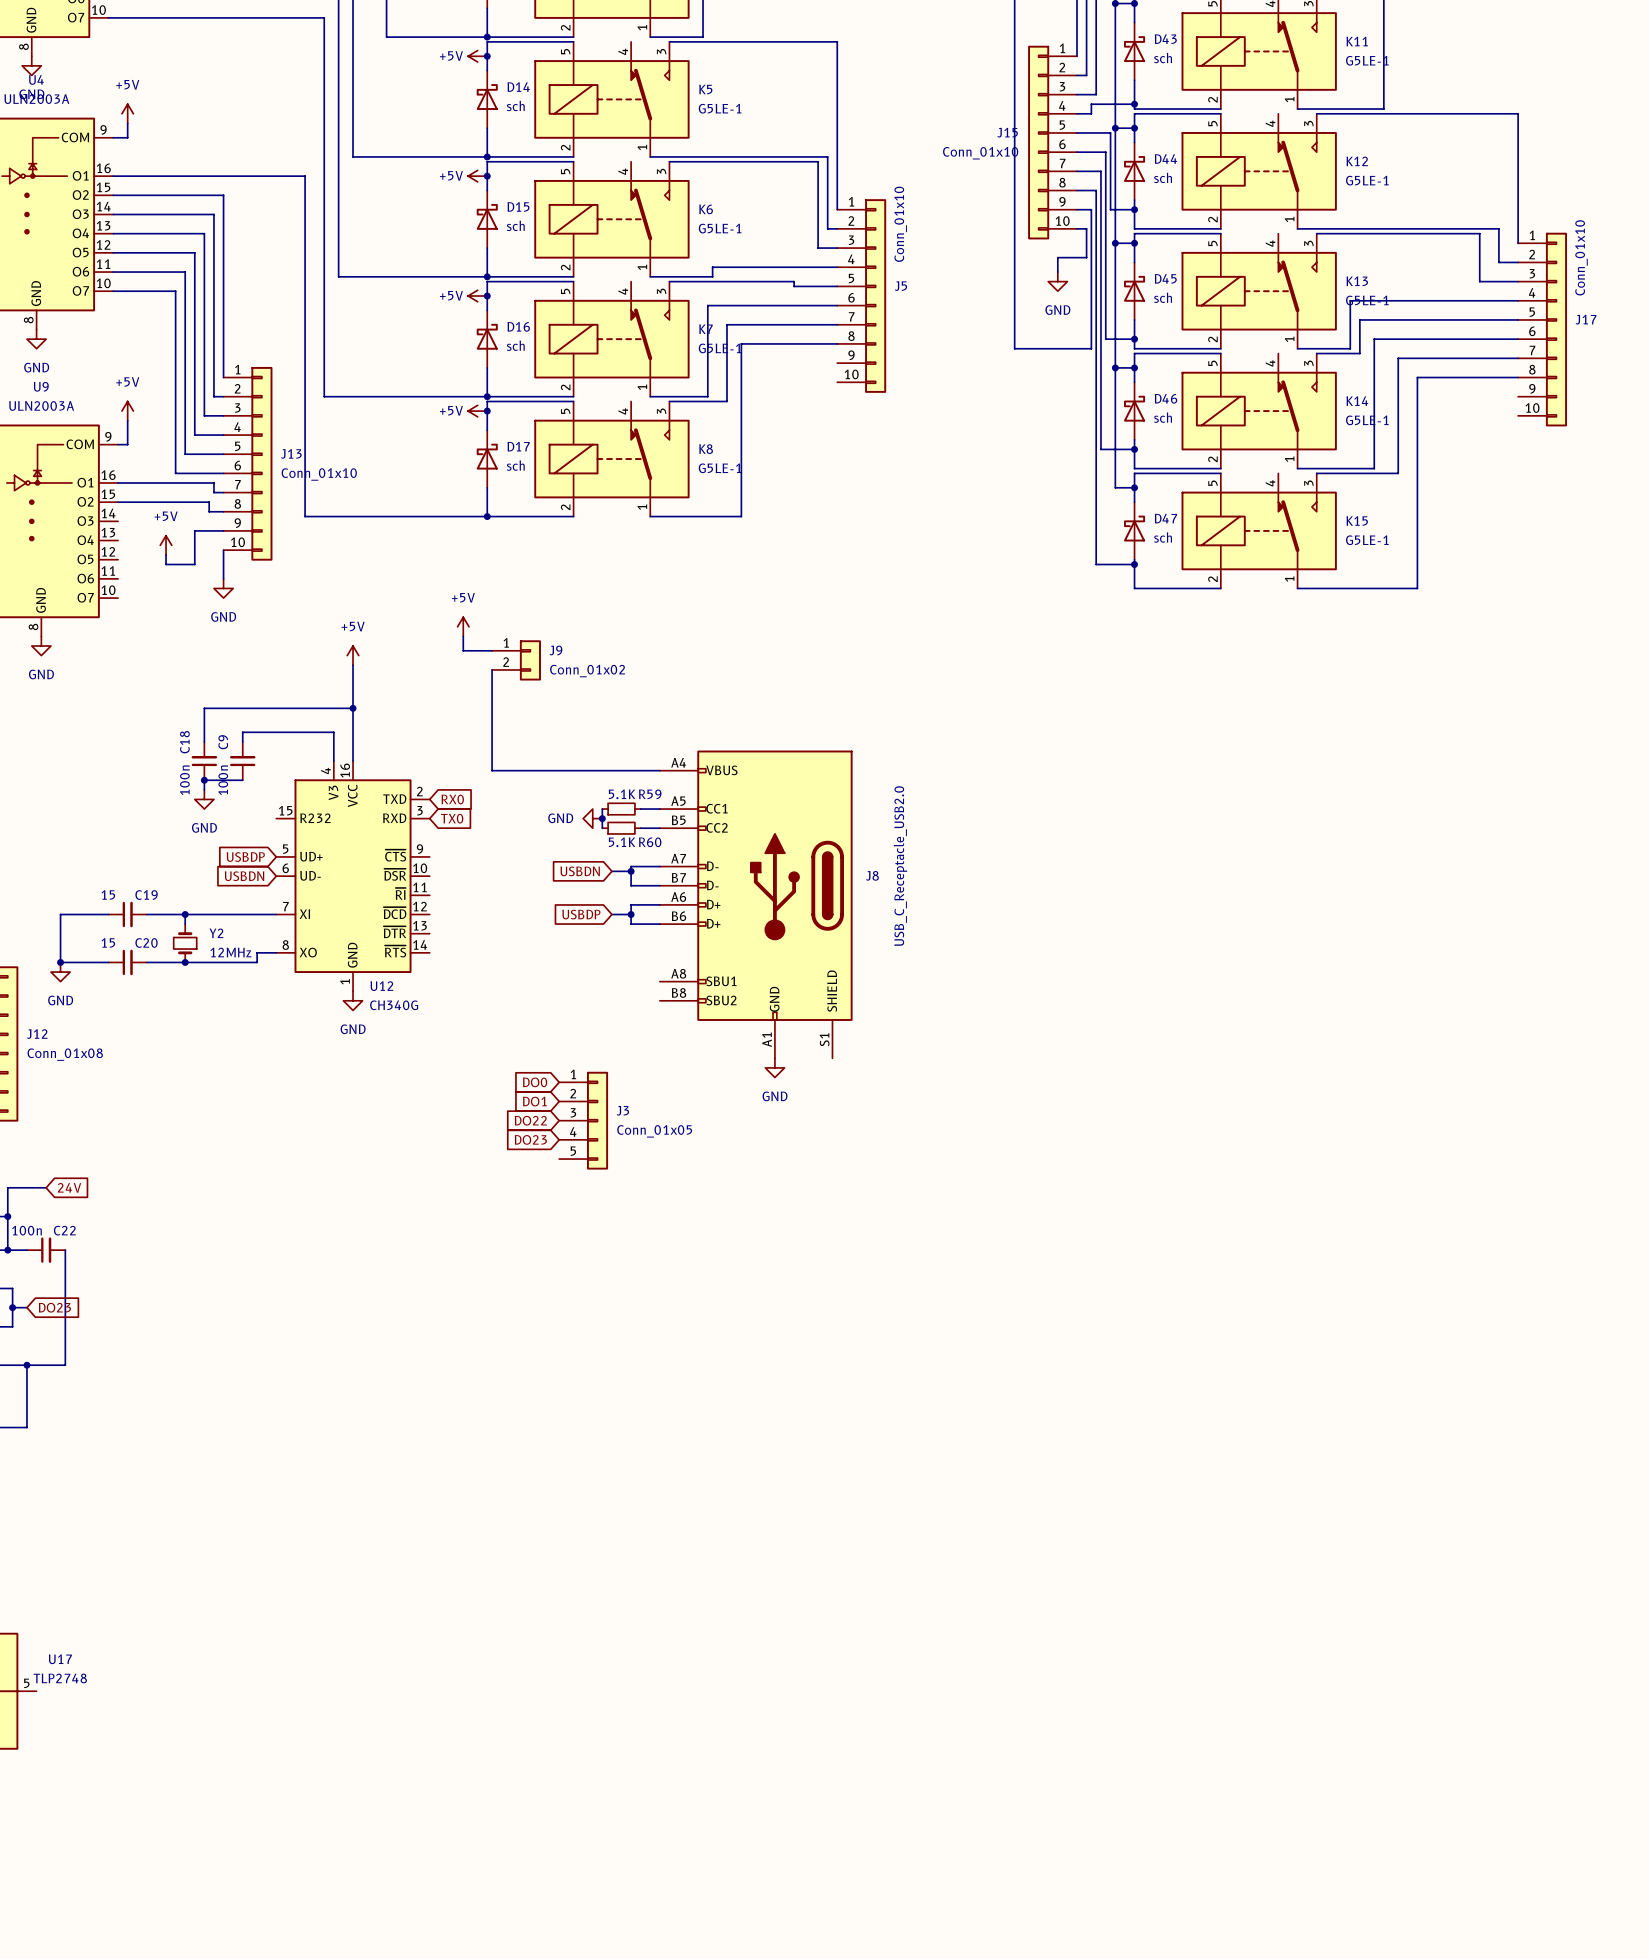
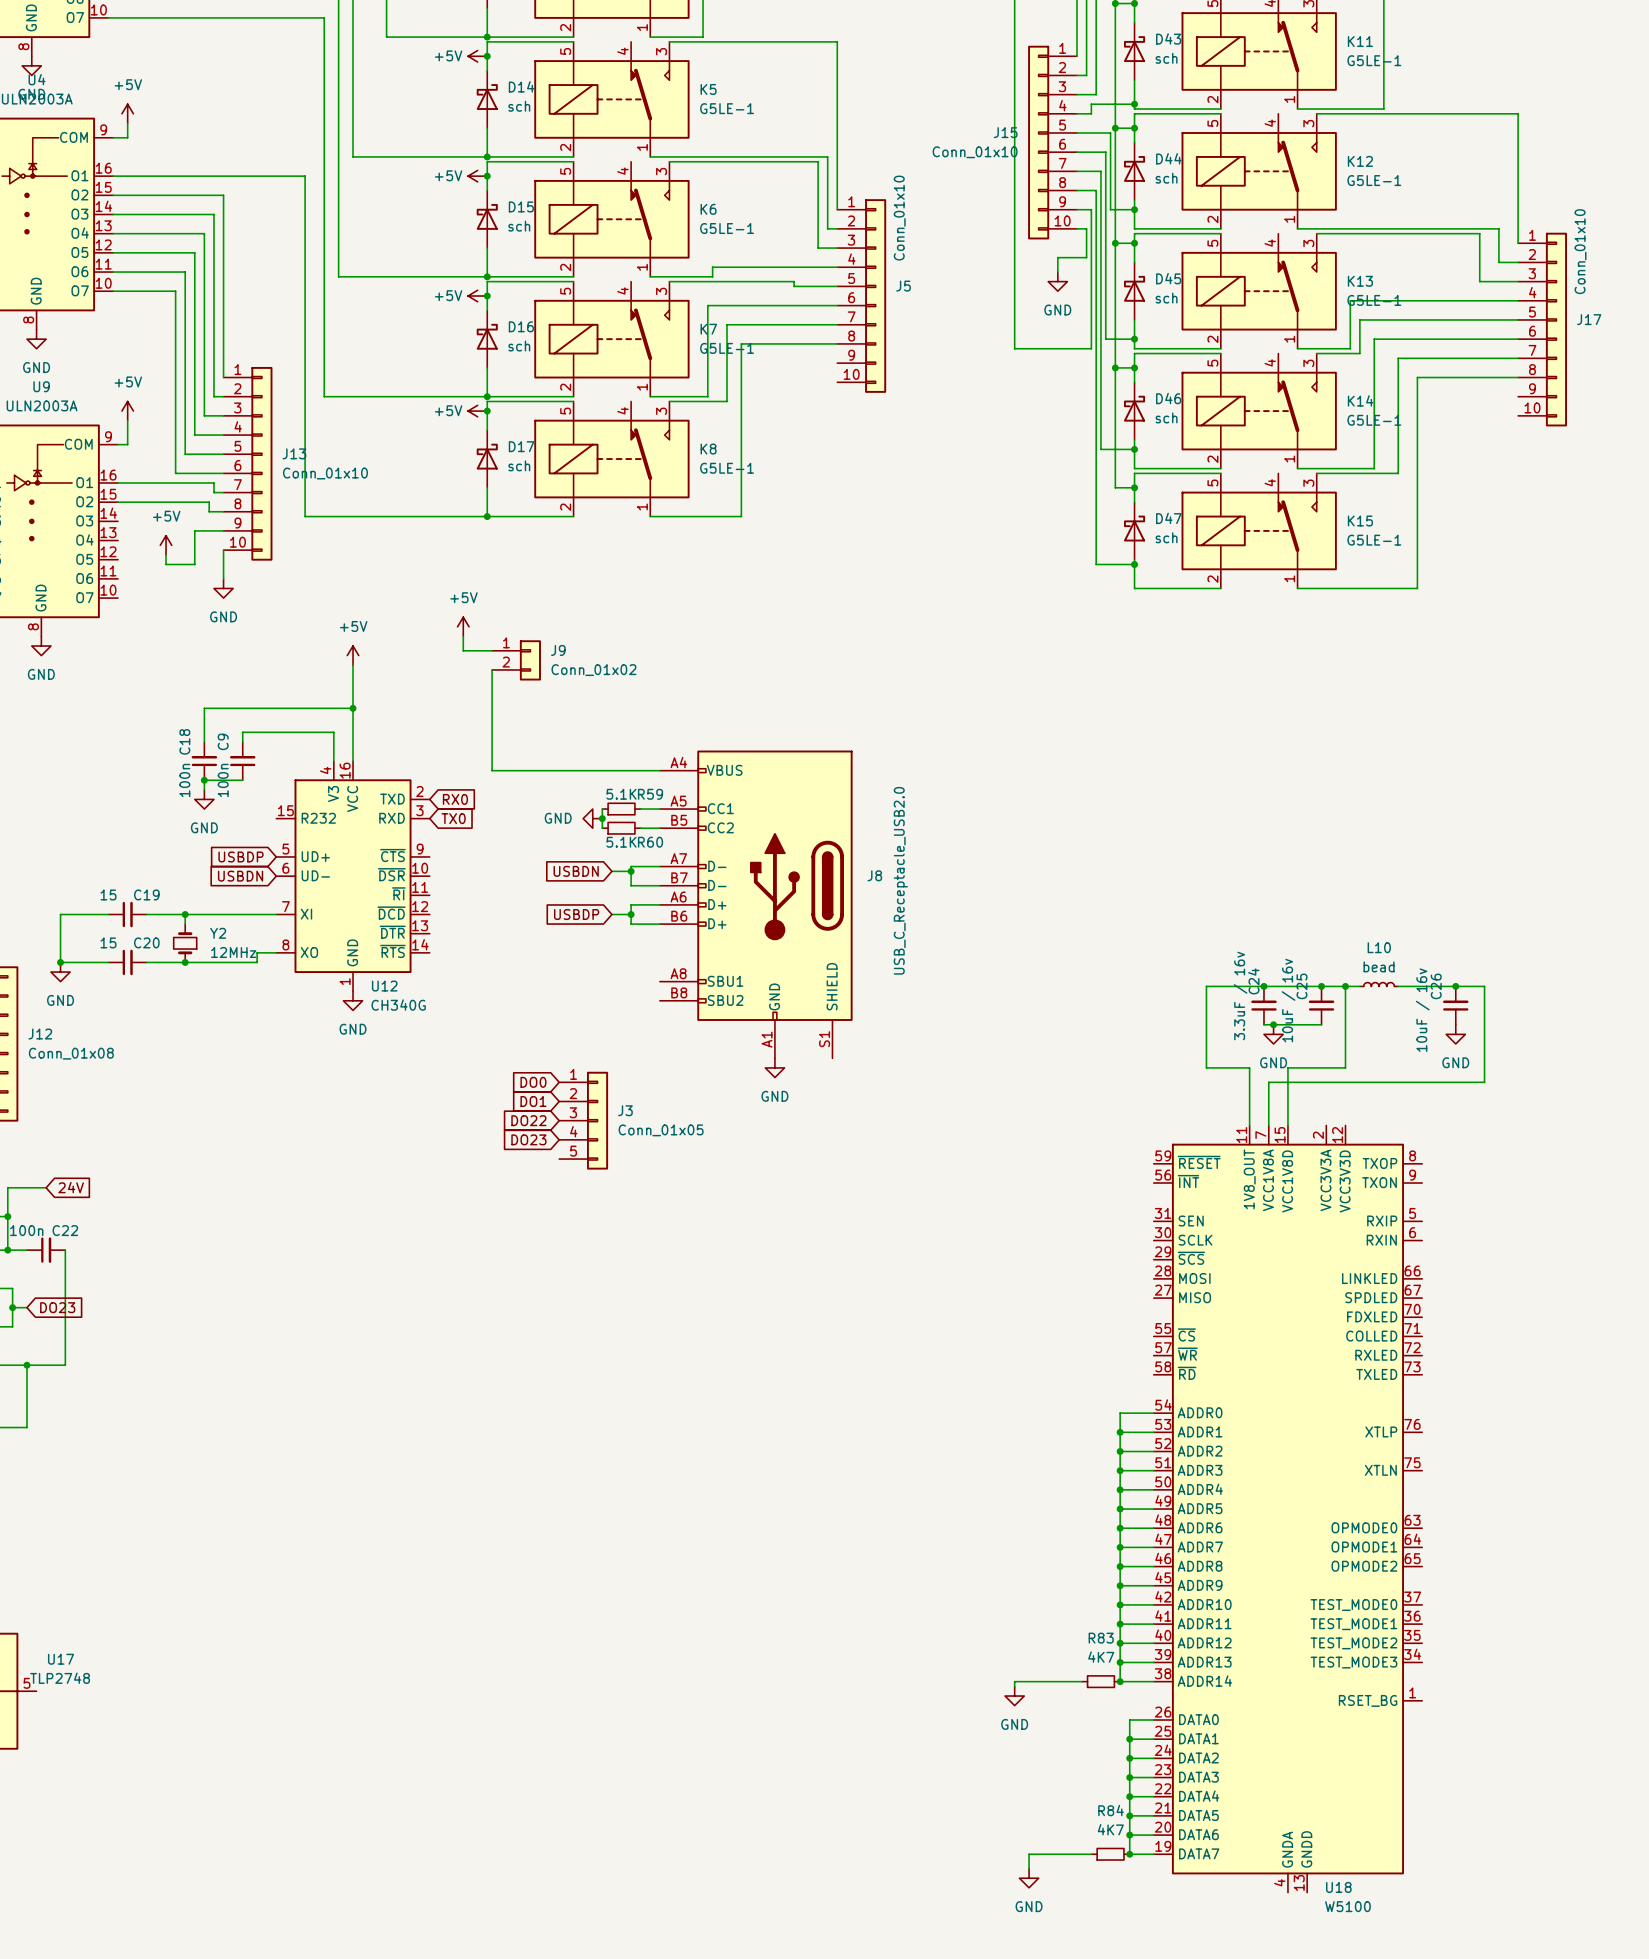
L10: none -> bead (1379, 984)
junction: none -> (1263, 986)
junction: none -> (1321, 986)
wire: none -> (1345, 986) (1345, 1067) (1287, 1067) (1287, 1125)
junction: none -> (1345, 986)
wire: none -> (1359, 986) (1206, 986) (1206, 1067) (1249, 1067) (1249, 1125)
wire: none -> (1398, 986) (1484, 986) (1484, 1082) (1268, 1082) (1268, 1125)
junction: none -> (1455, 986)
C24: none -> 3.3uF / 16v (1263, 1005)
C25: none -> 10uF / 16v (1321, 1005)
C26: none -> 10uF / 16v (1455, 1005)
wire: none -> (1263, 1024) (1321, 1024)
junction: none -> (1273, 1024)
power symbol: none -> GND (1273, 1034)
power symbol: none -> GND (1455, 1034)
wire: none -> (1153, 1413) (1120, 1413) (1120, 1681) (1153, 1681)
wire: none -> (1120, 1432) (1153, 1432)
junction: none -> (1120, 1432)
wire: none -> (1120, 1451) (1153, 1451)
junction: none -> (1120, 1451)
wire: none -> (1120, 1470) (1153, 1470)
junction: none -> (1120, 1470)
wire: none -> (1120, 1489) (1153, 1489)
junction: none -> (1120, 1489)
wire: none -> (1120, 1509) (1153, 1509)
junction: none -> (1120, 1509)
U18: none -> W5100 (1287, 1509)
wire: none -> (1120, 1528) (1153, 1528)
junction: none -> (1120, 1528)
wire: none -> (1120, 1547) (1153, 1547)
junction: none -> (1120, 1547)
wire: none -> (1120, 1566) (1153, 1566)
junction: none -> (1120, 1566)
wire: none -> (1120, 1585) (1153, 1585)
junction: none -> (1120, 1585)
wire: none -> (1120, 1604) (1153, 1604)
junction: none -> (1120, 1604)
wire: none -> (1120, 1624) (1153, 1624)
junction: none -> (1120, 1624)
wire: none -> (1120, 1643) (1153, 1643)
junction: none -> (1120, 1643)
wire: none -> (1120, 1662) (1153, 1662)
junction: none -> (1120, 1662)
wire: none -> (1081, 1681) (1014, 1681) (1014, 1686)
R83: none -> 4K7 (1100, 1681)
junction: none -> (1120, 1681)
power symbol: none -> GND (1014, 1696)
wire: none -> (1153, 1720) (1129, 1720) (1129, 1854) (1153, 1854)
wire: none -> (1129, 1739) (1153, 1739)
junction: none -> (1129, 1739)
wire: none -> (1129, 1758) (1153, 1758)
junction: none -> (1129, 1758)
wire: none -> (1129, 1777) (1153, 1777)
junction: none -> (1129, 1777)
wire: none -> (1129, 1796) (1153, 1796)
junction: none -> (1129, 1796)
wire: none -> (1129, 1815) (1153, 1815)
junction: none -> (1129, 1815)
wire: none -> (1129, 1835) (1153, 1835)
junction: none -> (1129, 1835)
wire: none -> (1091, 1854) (1029, 1854) (1029, 1868)
R84: none -> 4K7 (1110, 1854)
junction: none -> (1129, 1854)
power symbol: none -> GND (1029, 1878)

